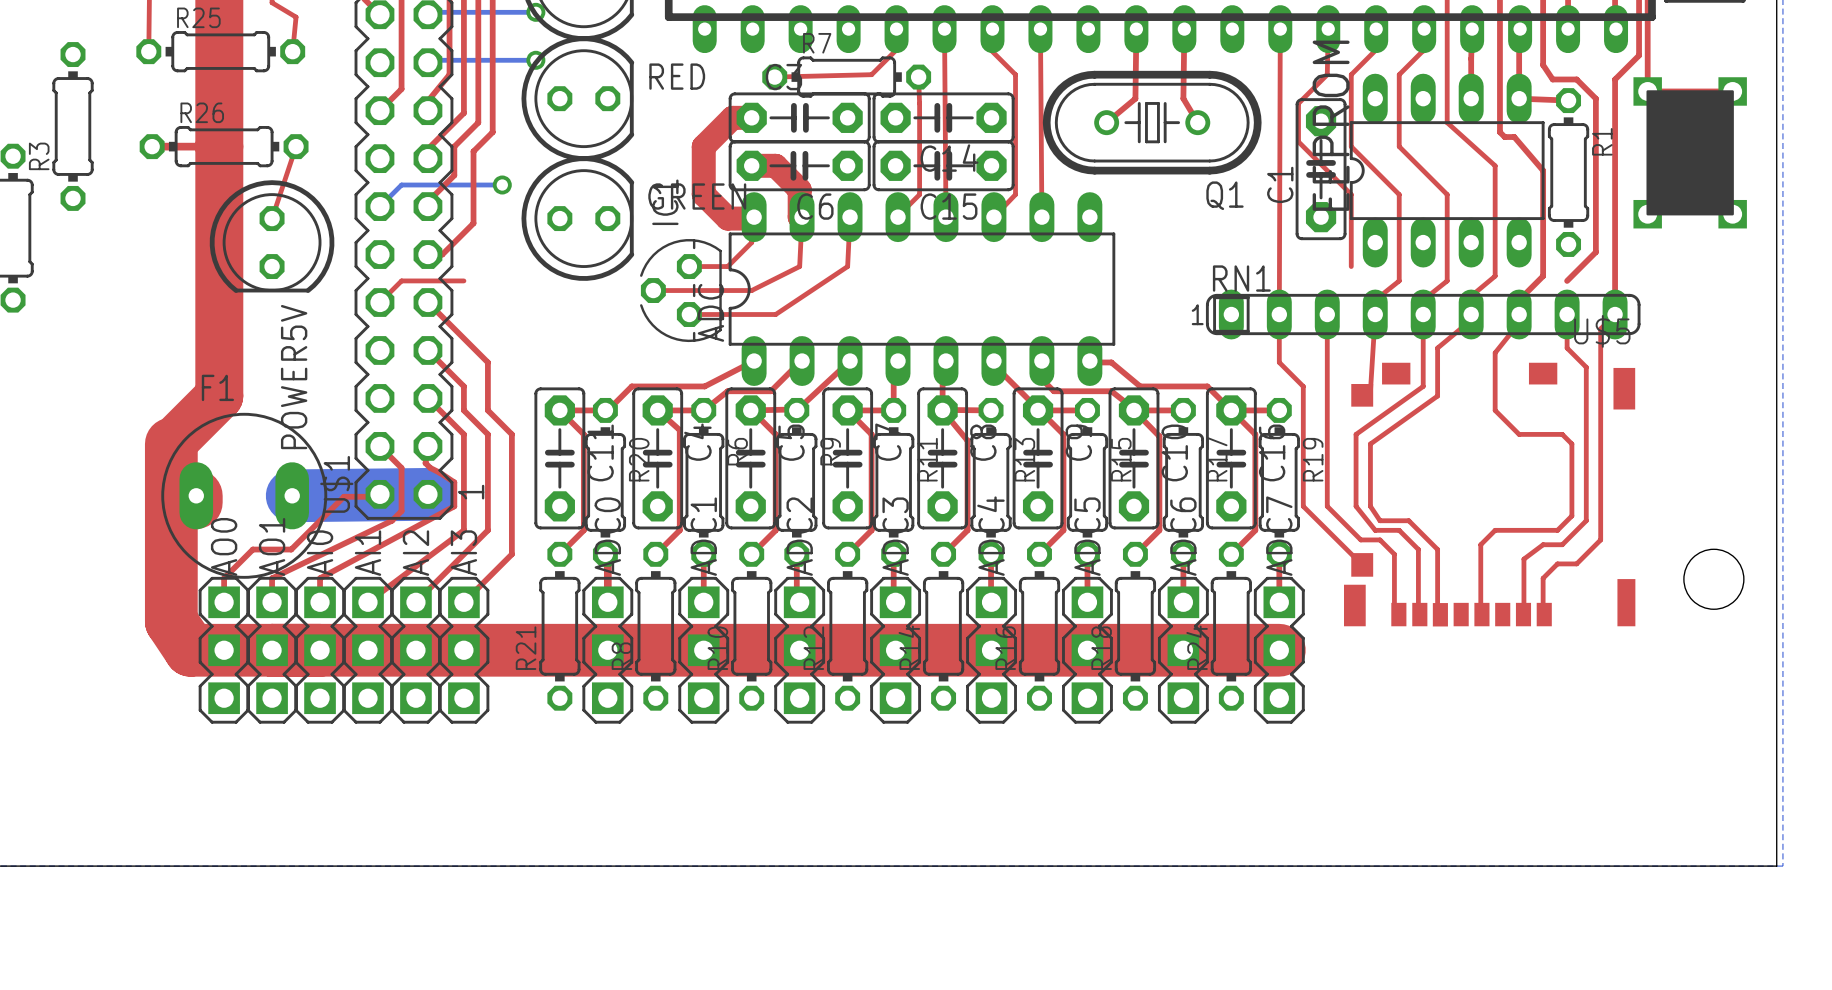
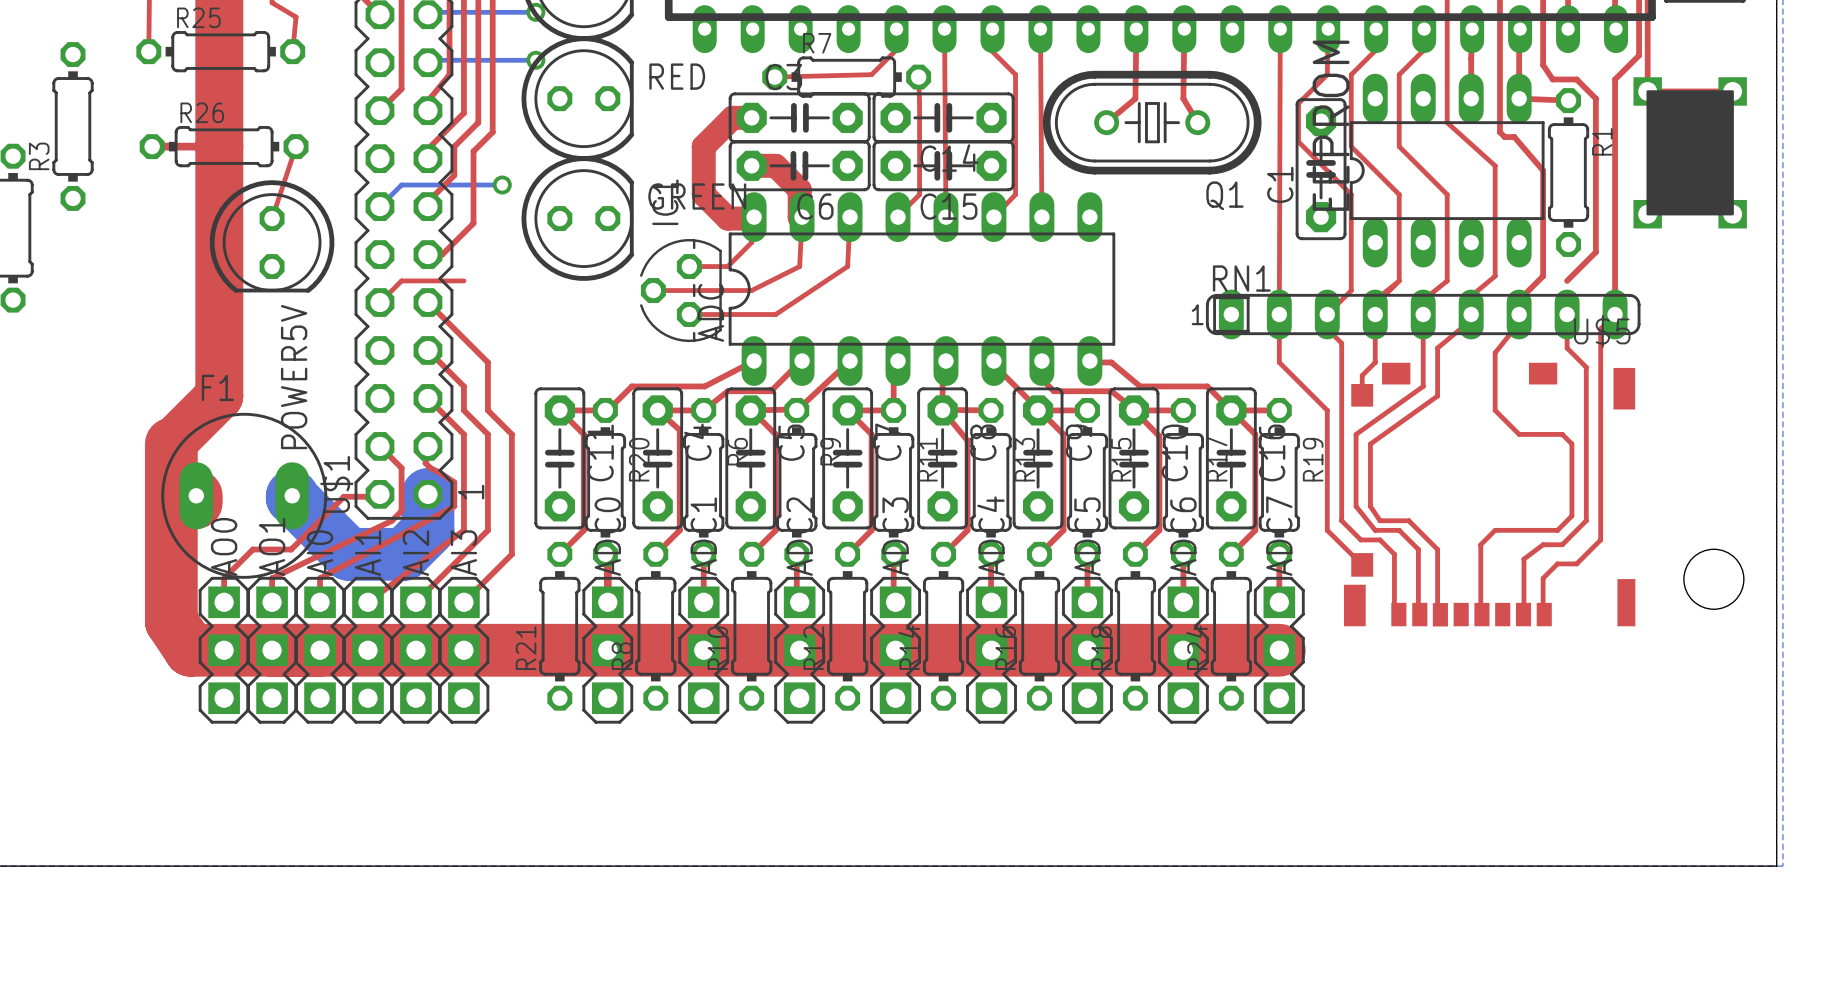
top track: none -> (1351, 266) (1351, 290) (1327, 314)
top track: (1375, 314) (1370, 391) (1362, 395) -> (1399, 280) (1375, 304) (1375, 362) (1362, 375) (1362, 395)
top track: (1327, 328) (1327, 410) -> (1303, 386) (1327, 410)
top track: none -> (1327, 328) (1341, 343) (1341, 520)
top track: (1303, 386) (1303, 506) (1362, 564) -> none
bottom track: (427, 494) (292, 495) -> (427, 494) (427, 530) (403, 554) (348, 554) (292, 495)
top track: (1327, 506) (1341, 520) -> (1327, 506) (1327, 530) (1362, 564)

